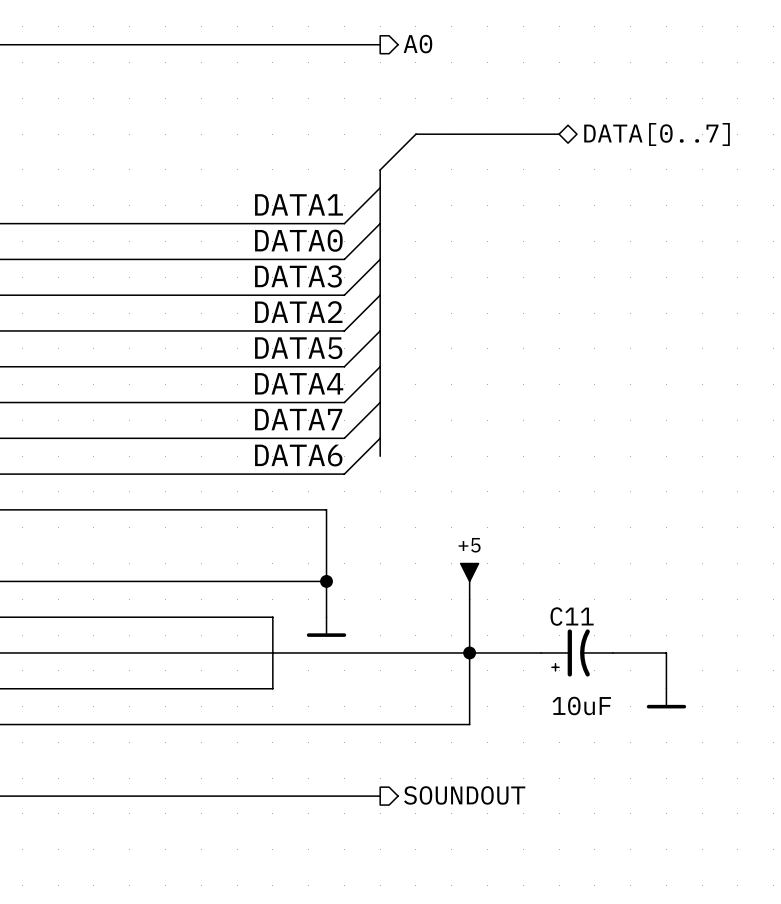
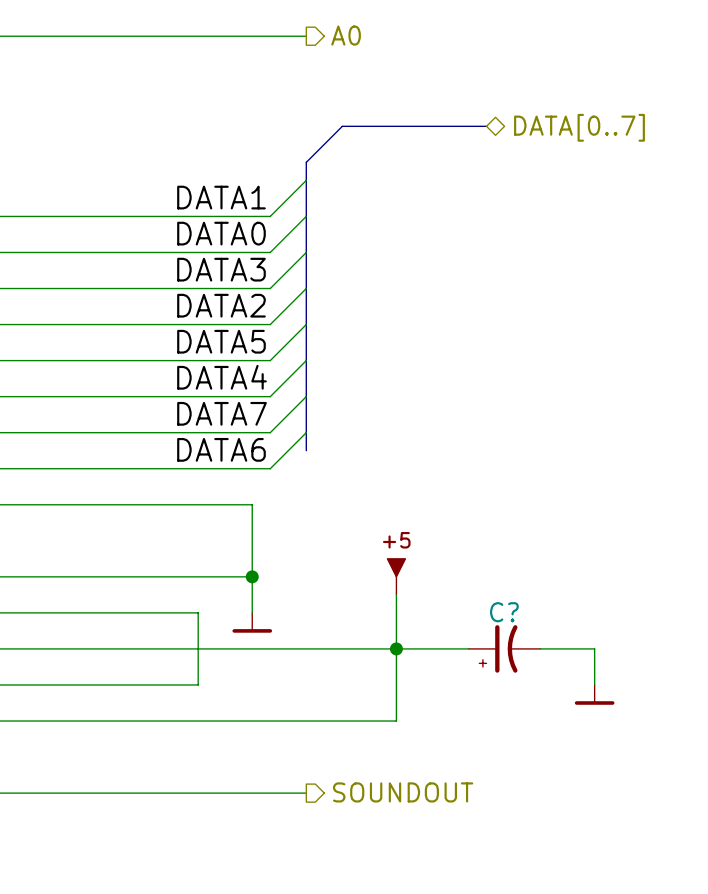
C11 name: C11 (572, 616) -> C? (504, 612)
C11 value: 10uF (581, 705) -> none

